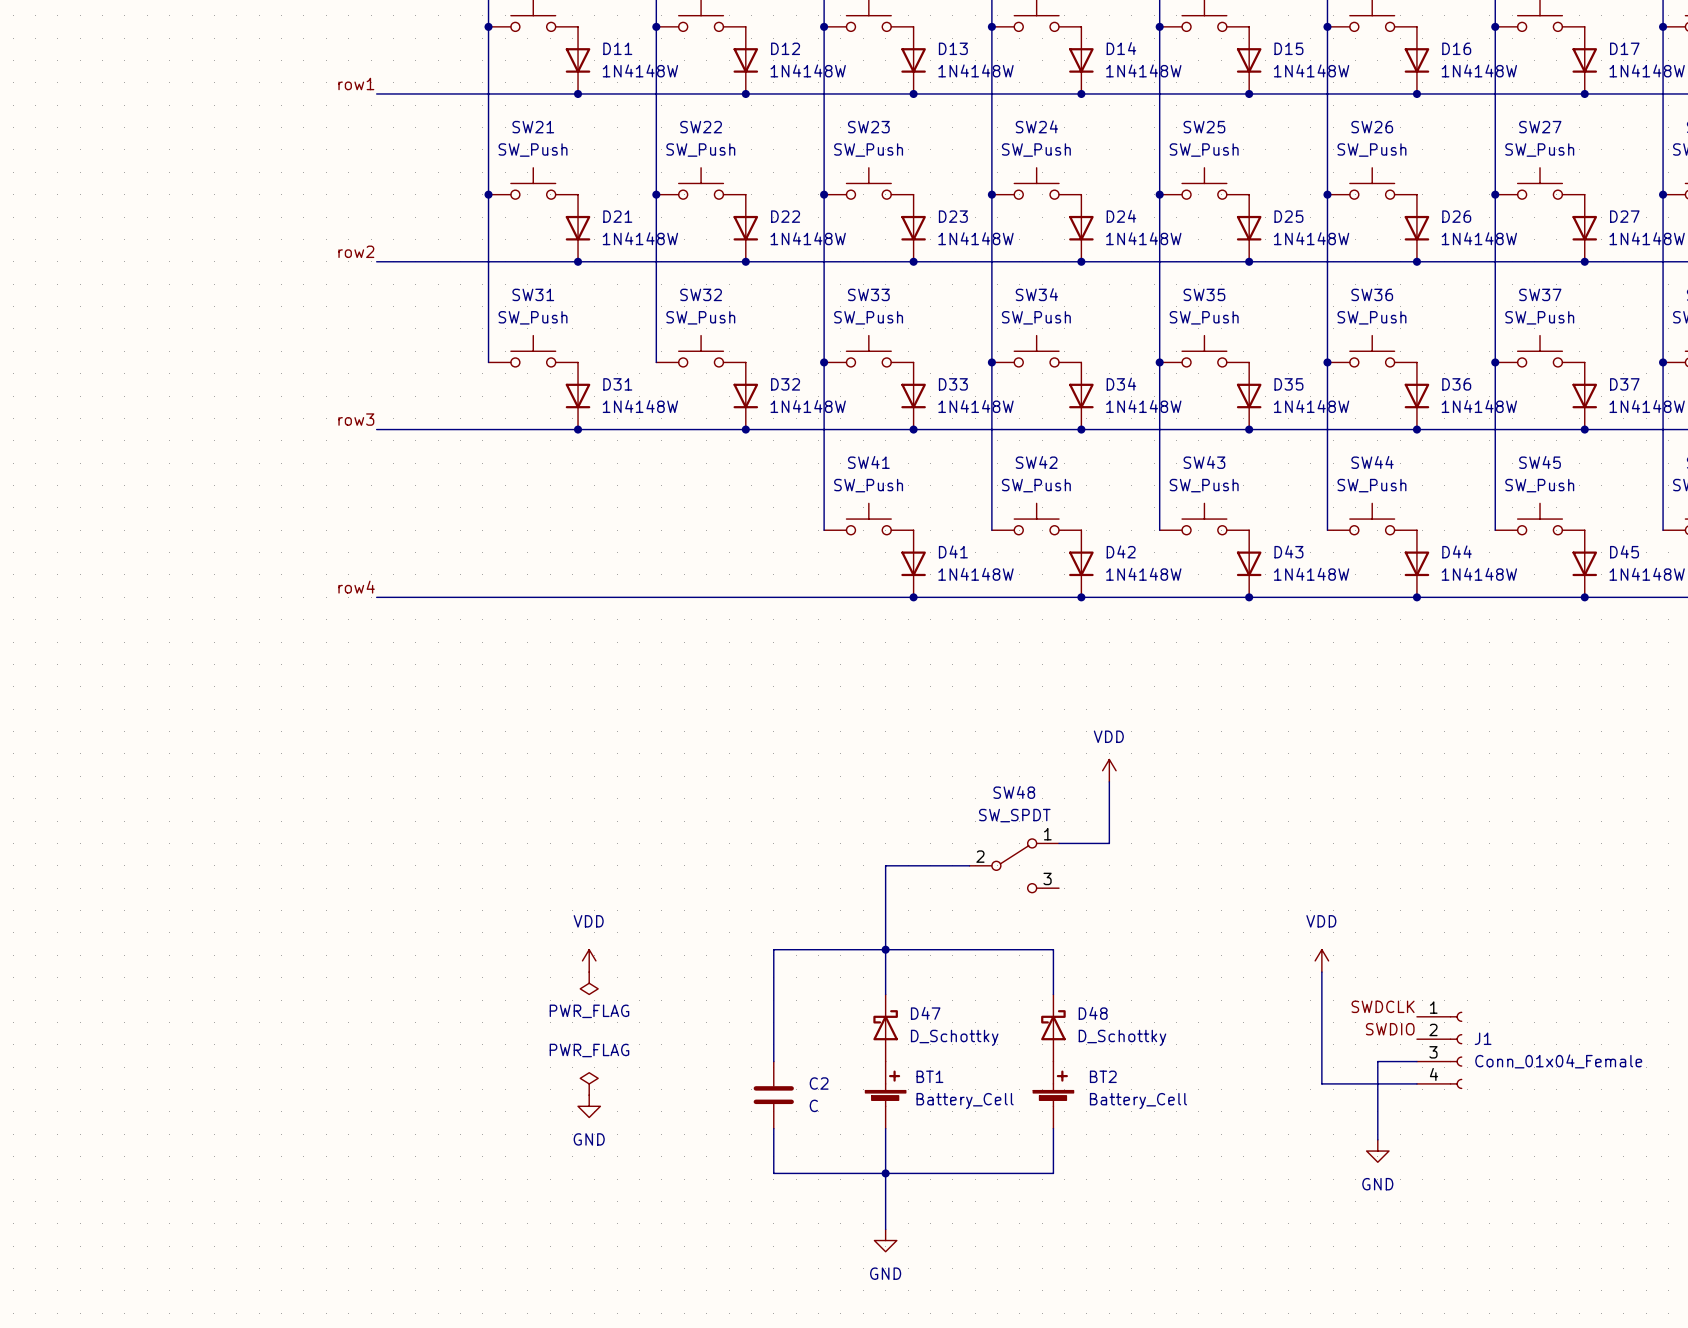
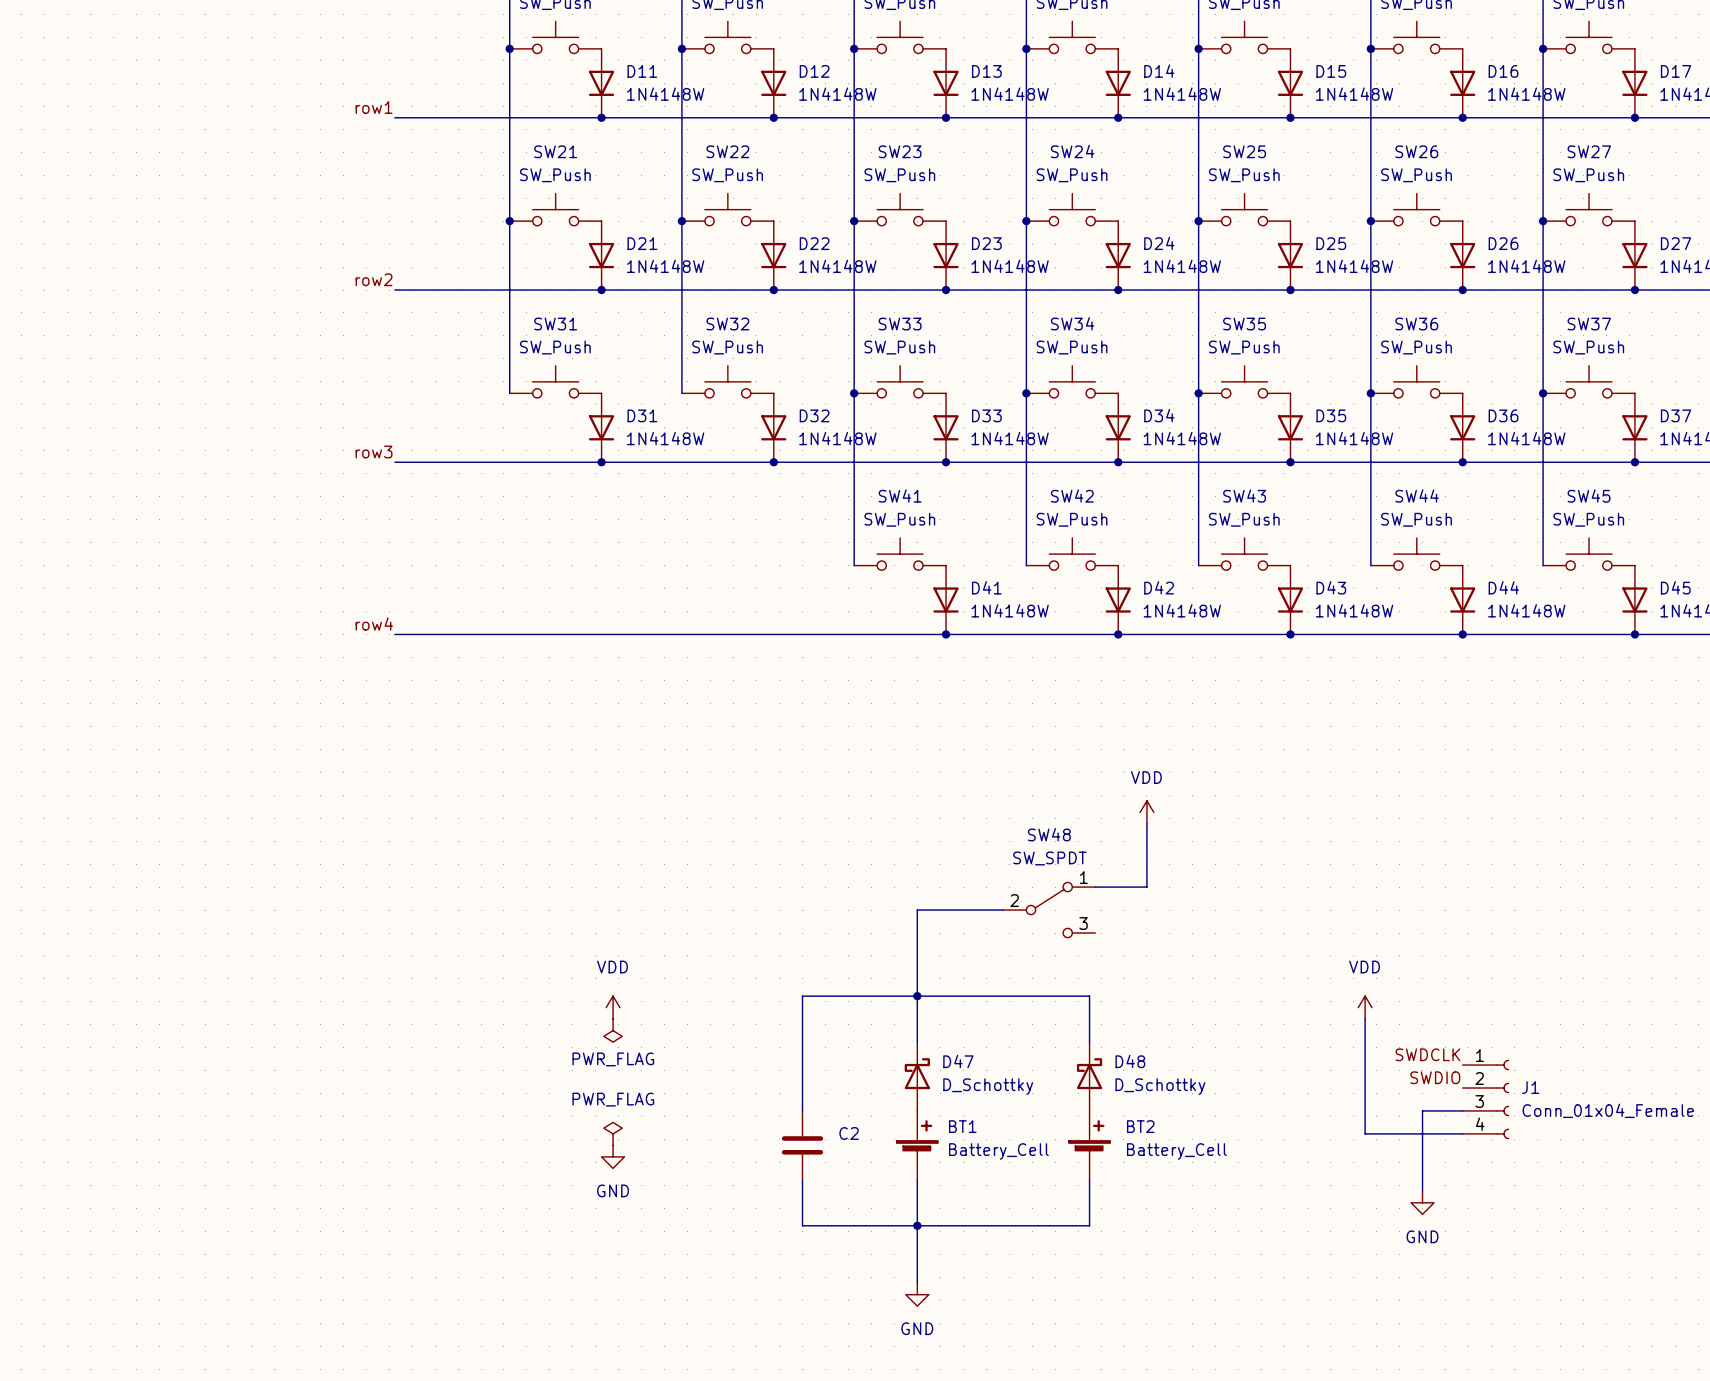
C2 value: C (813, 1105) -> none

